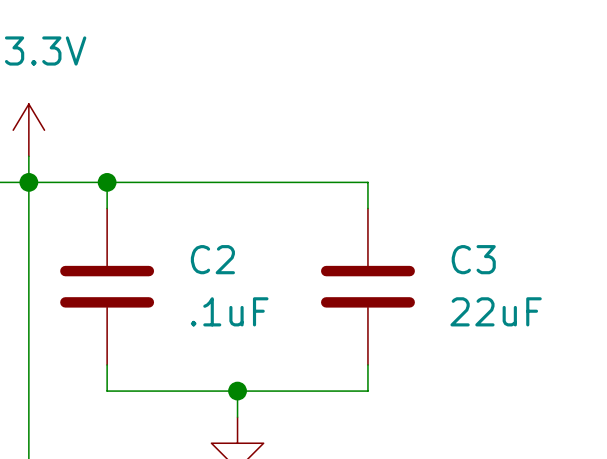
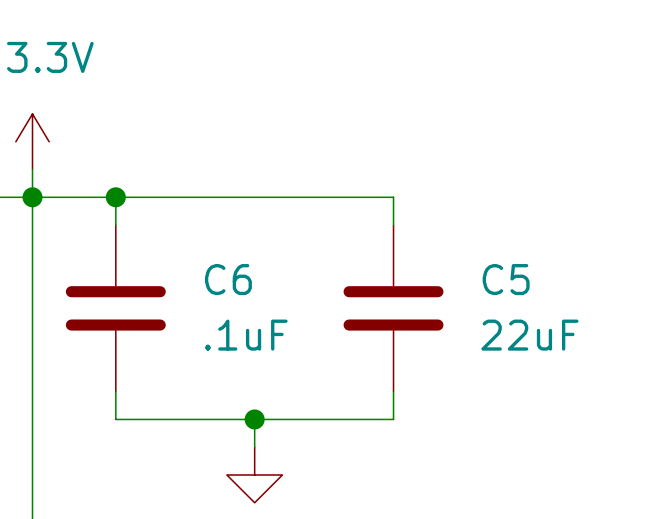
C2 name: C2 (212, 259) -> C6 (228, 279)
C3 name: C3 (473, 259) -> C5 (506, 279)

